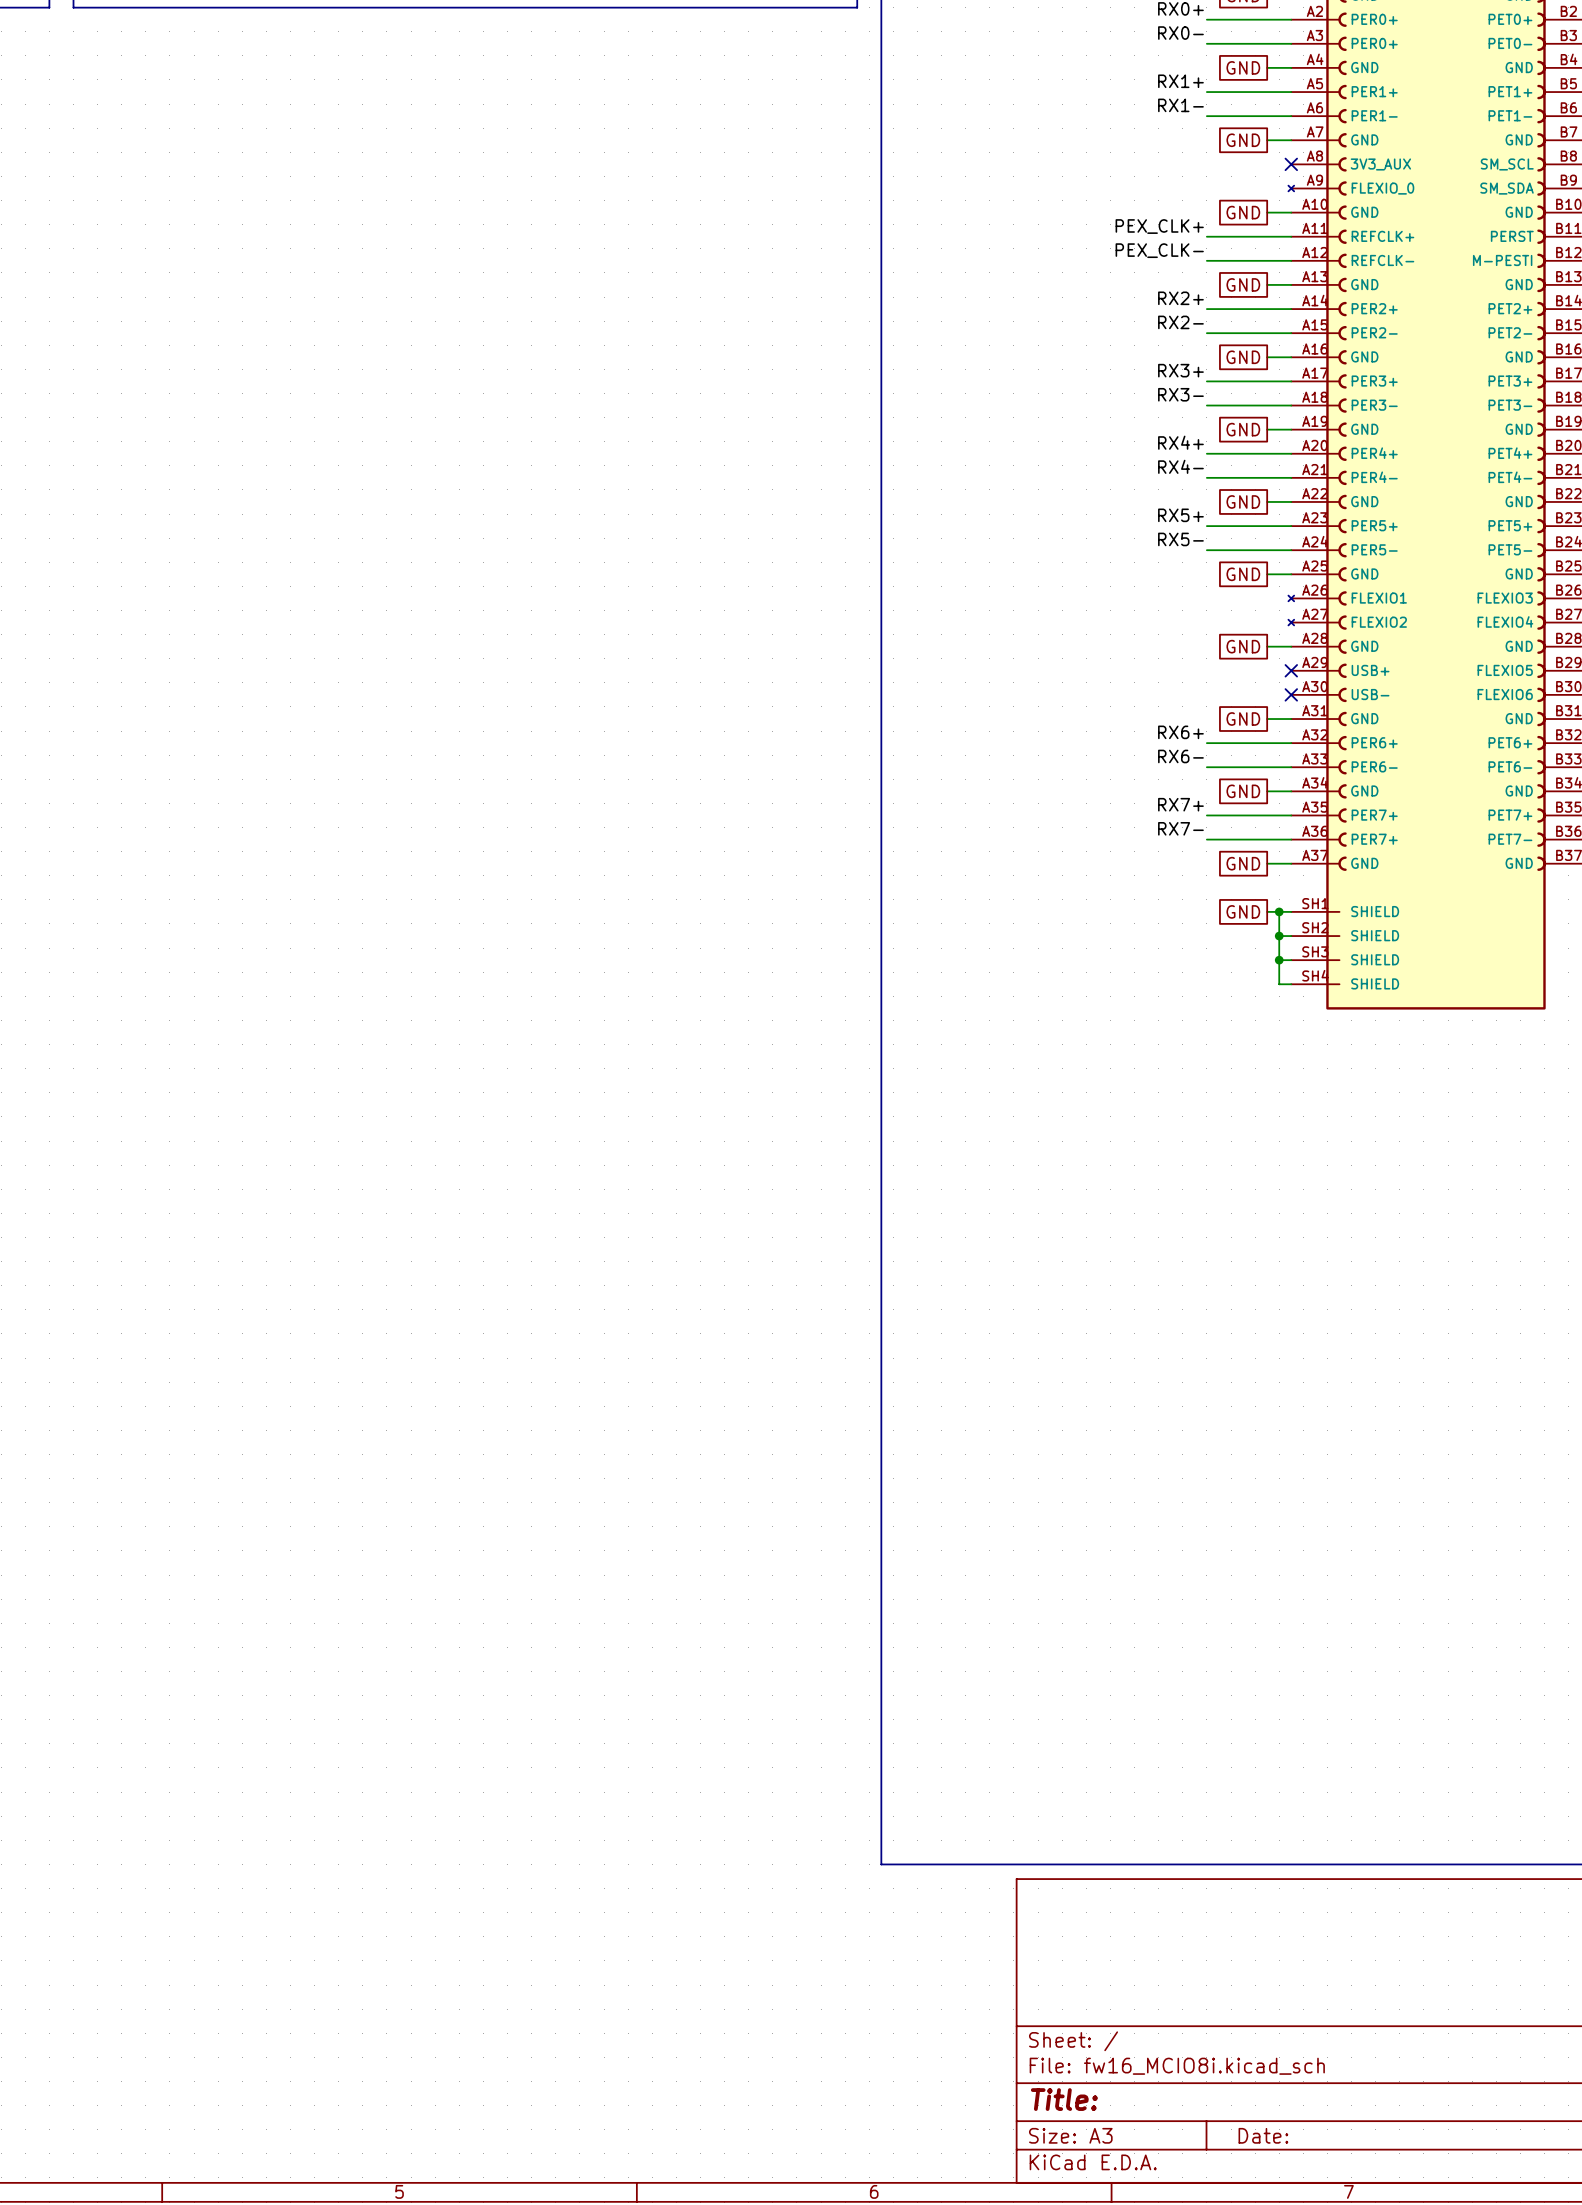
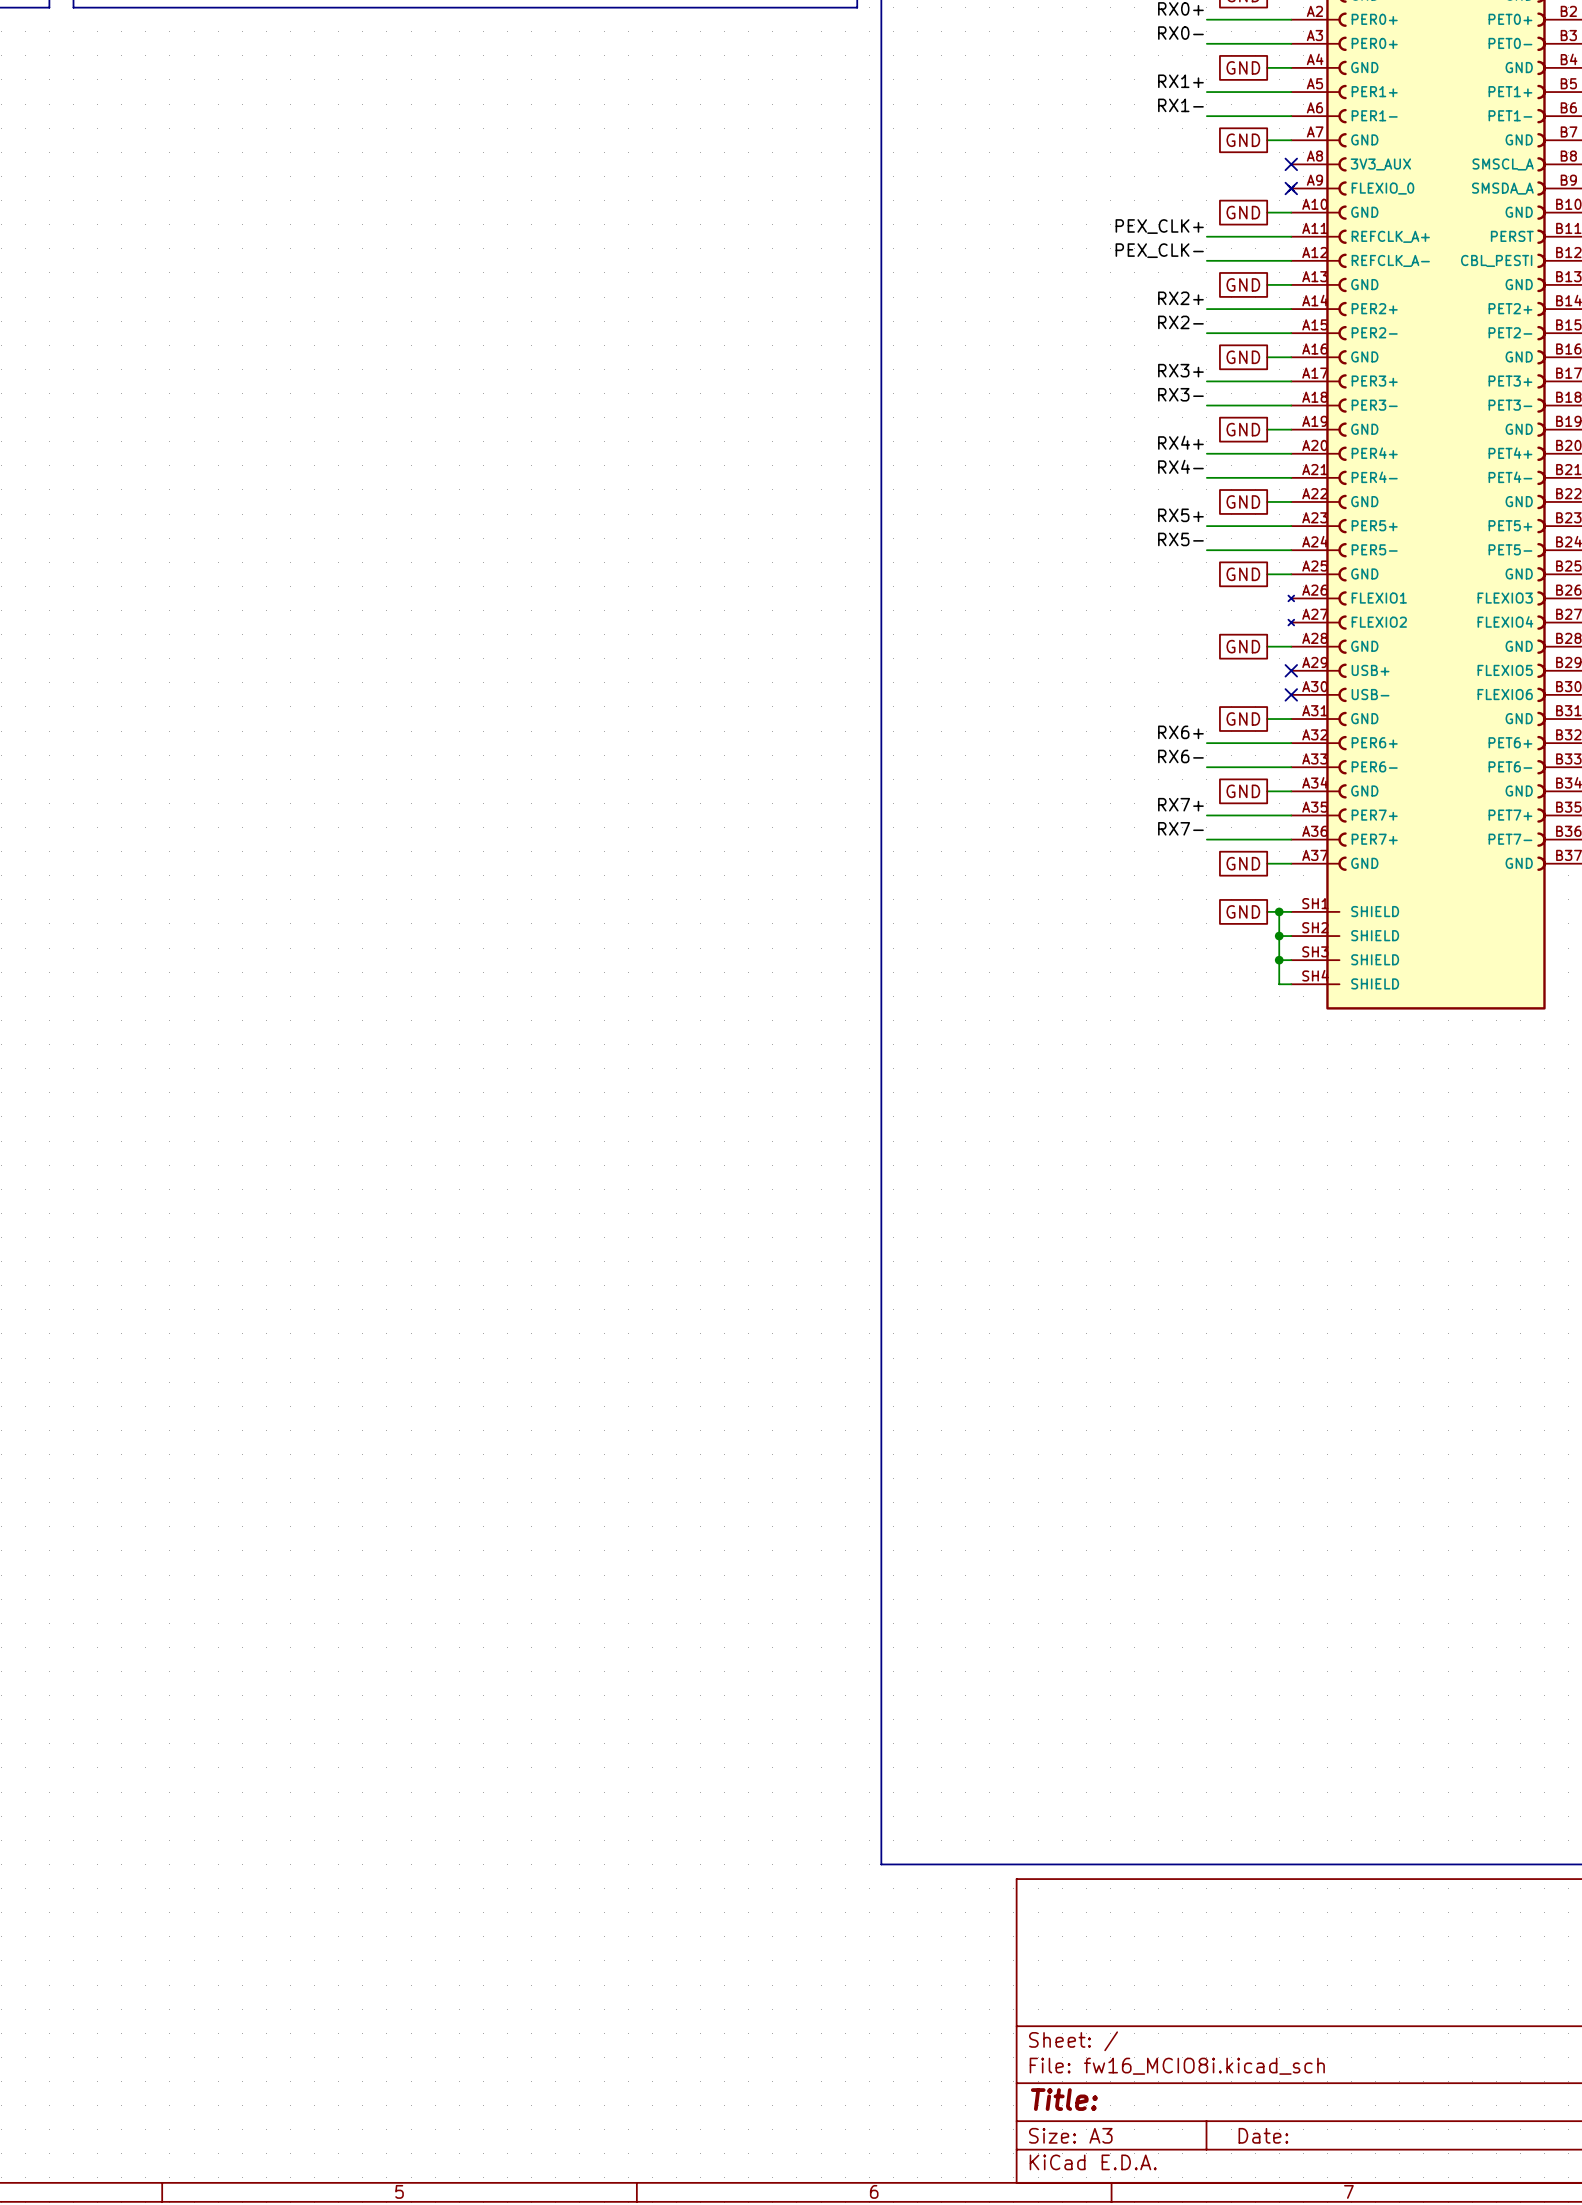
part pin name: SM_SCL (1507, 164) -> SMSCL_A (1503, 164)
no-connect mark: none -> (1291, 188)
part pin name: SM_SDA (1507, 188) -> SMSDA_A (1502, 188)
part pin name: REFCLK+ (1382, 236) -> REFCLK_A+ (1390, 236)
part pin name: REFCLK- (1382, 260) -> REFCLK_A- (1390, 260)
part pin name: M-PESTI (1502, 260) -> CBL_PESTI (1496, 260)

